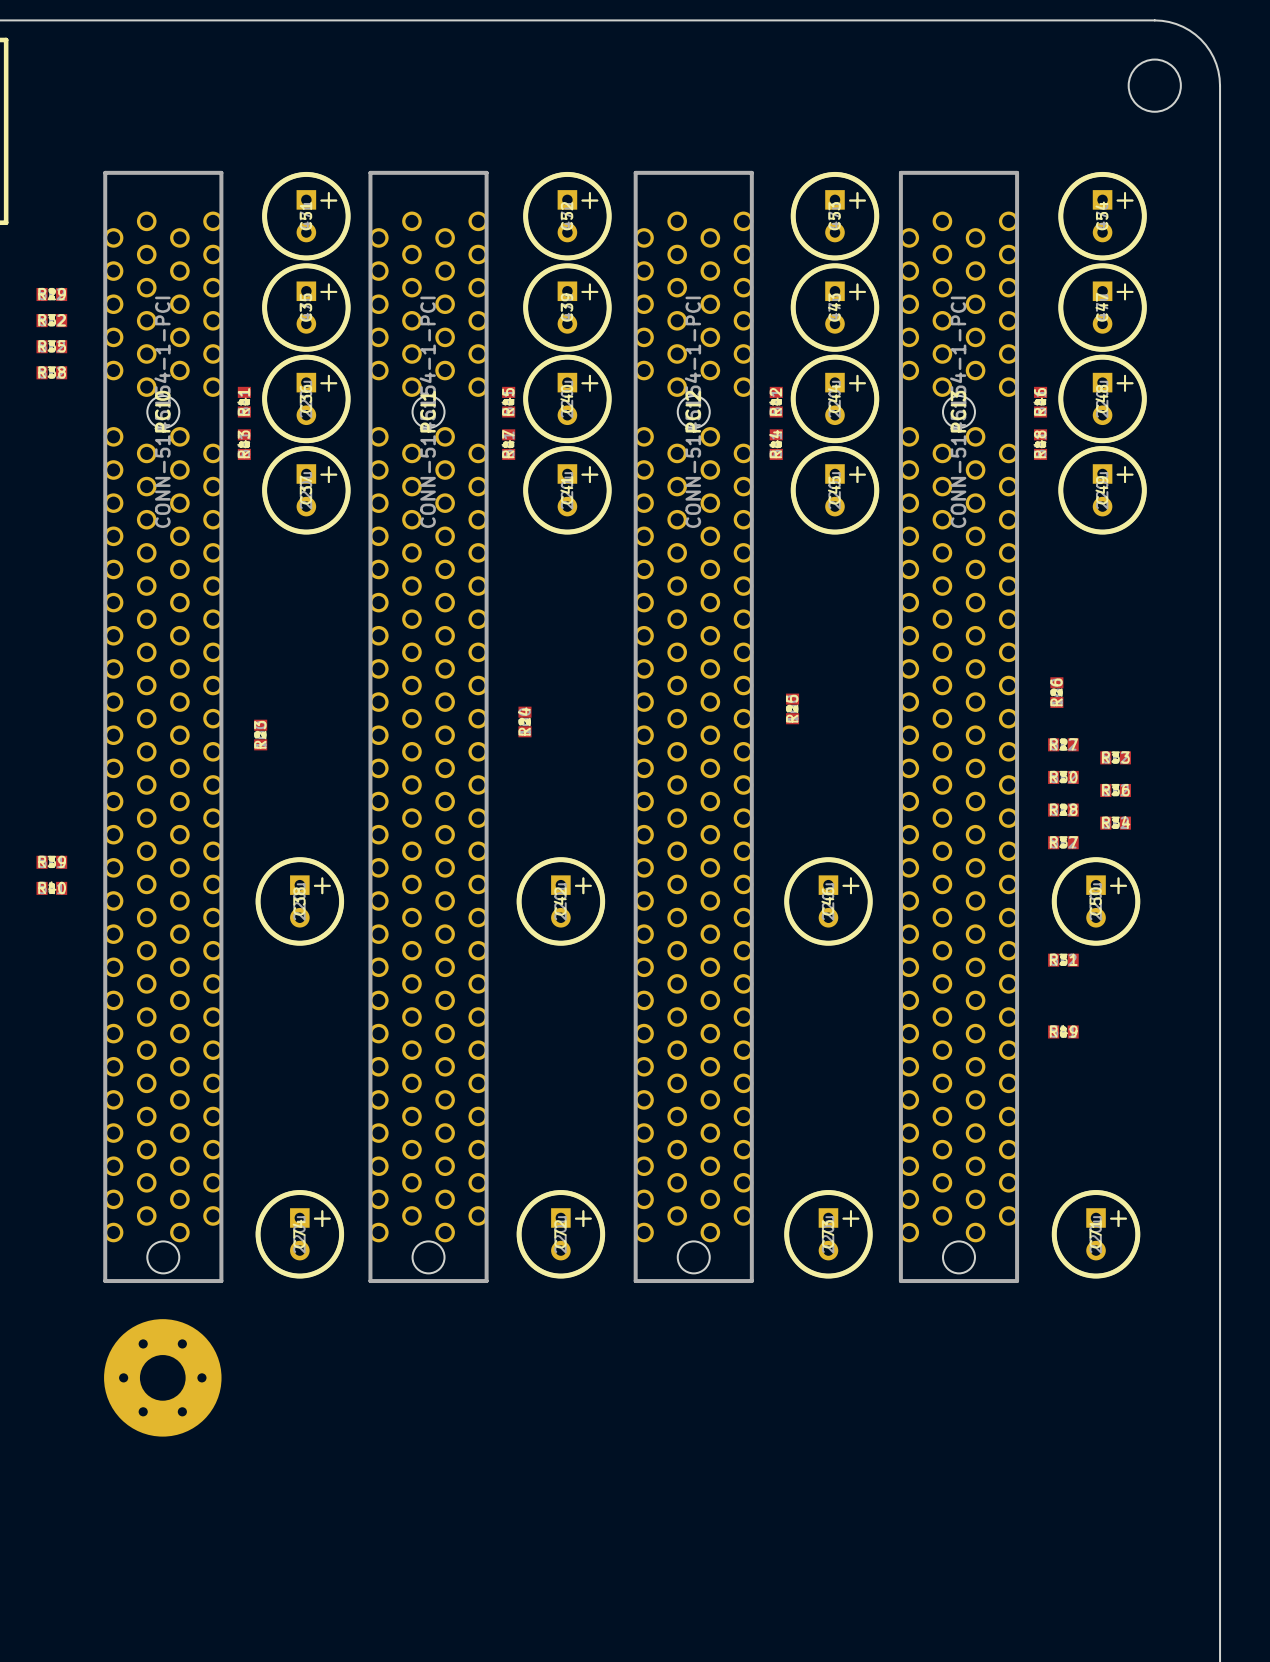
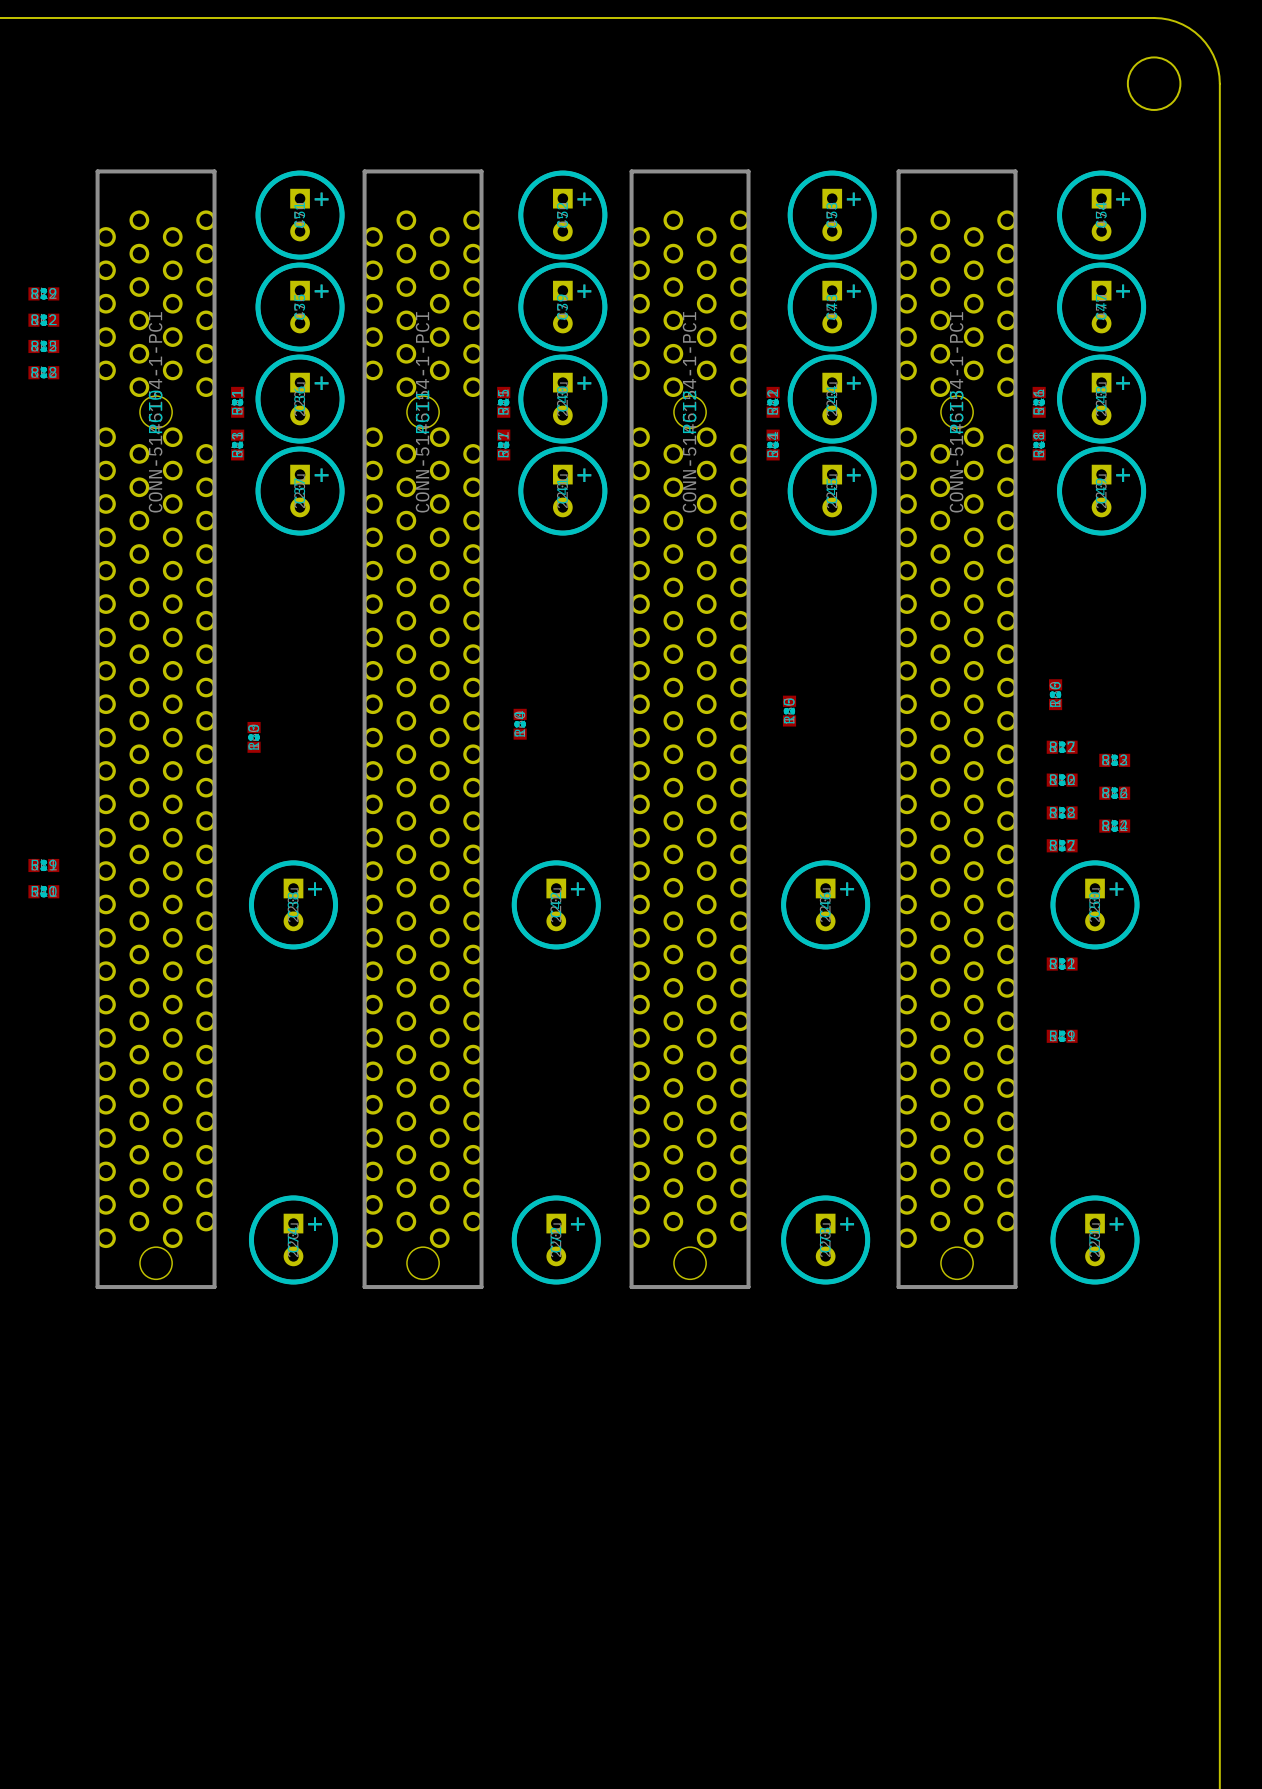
part: (162, 1377) -> none

